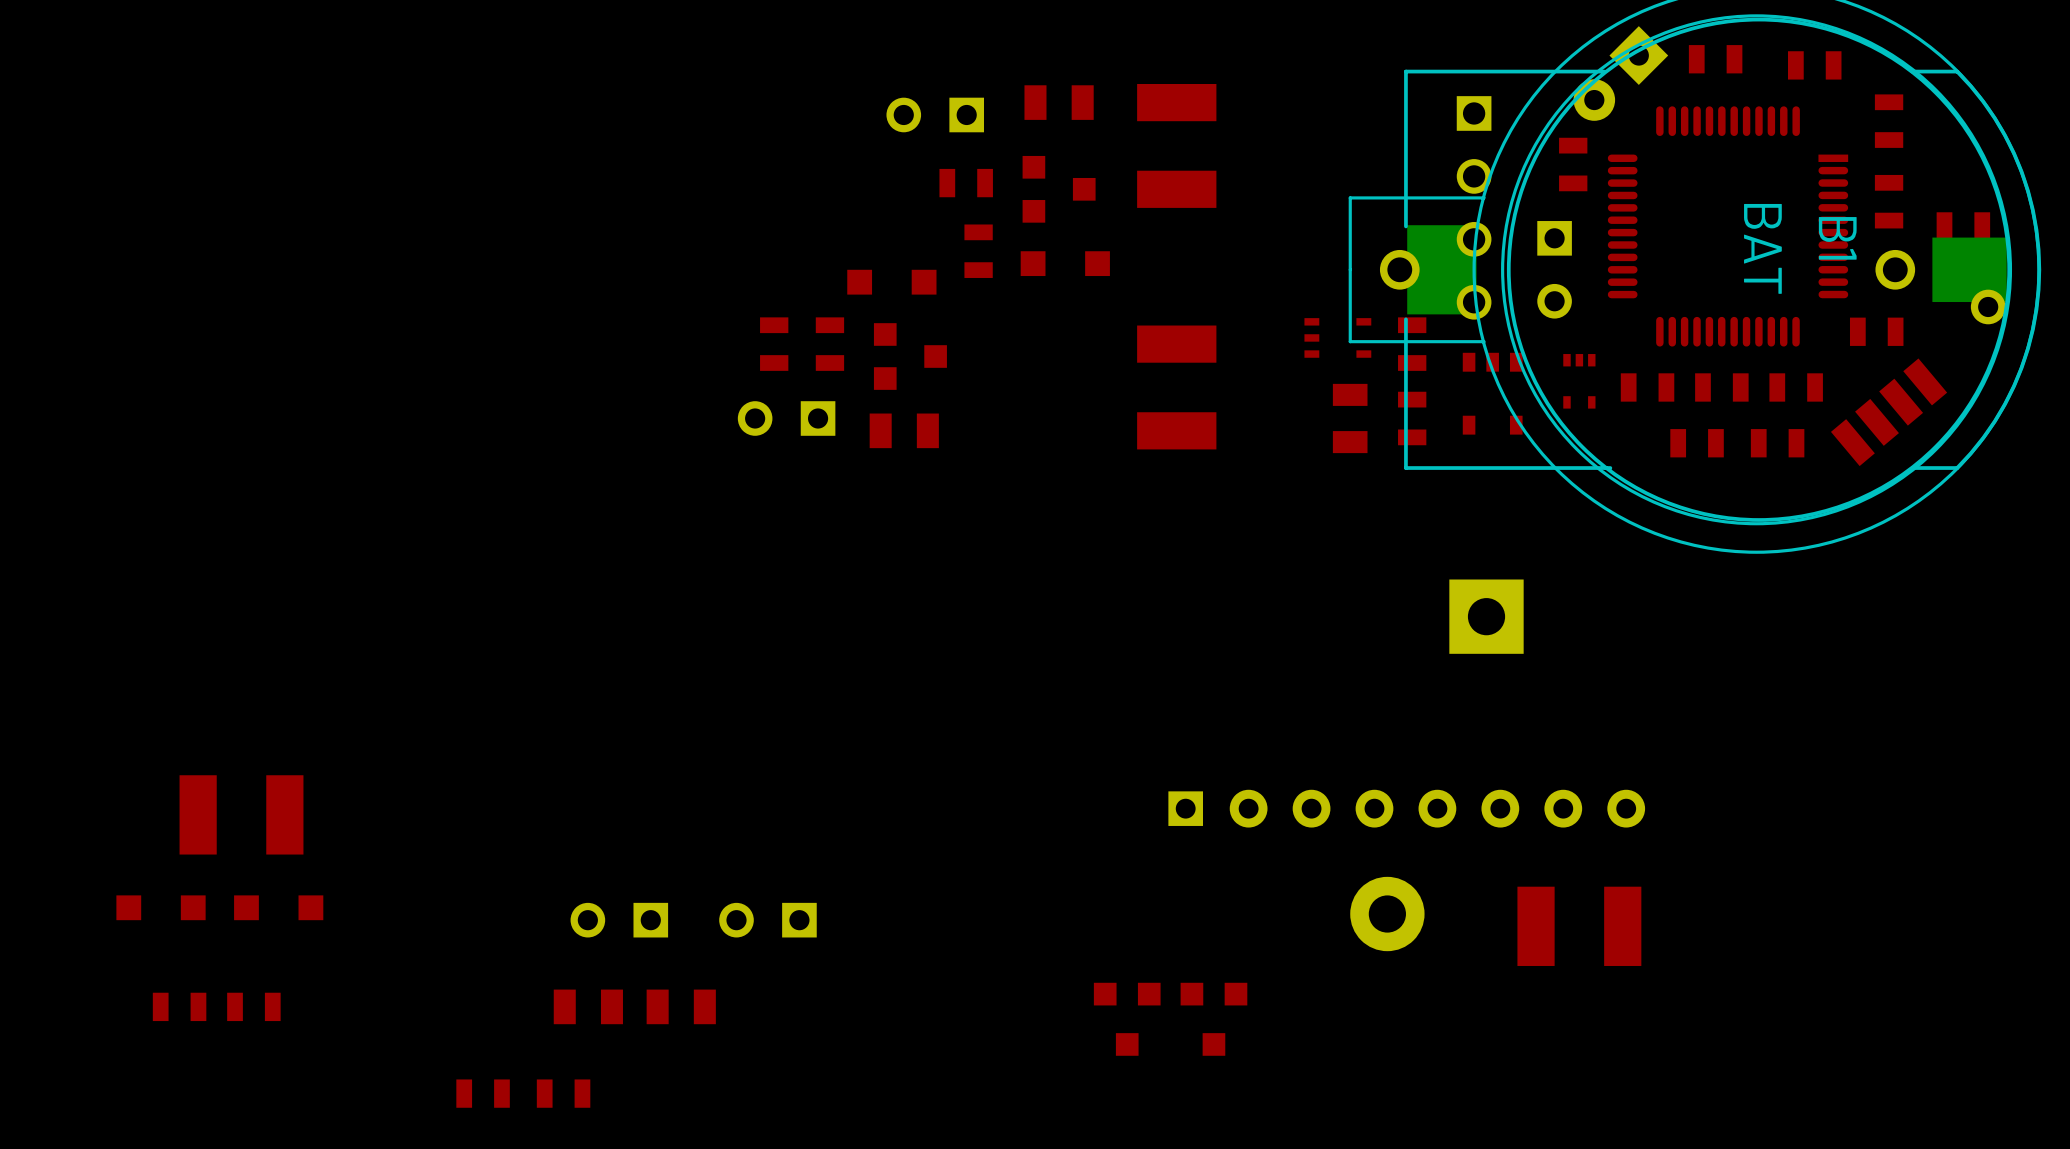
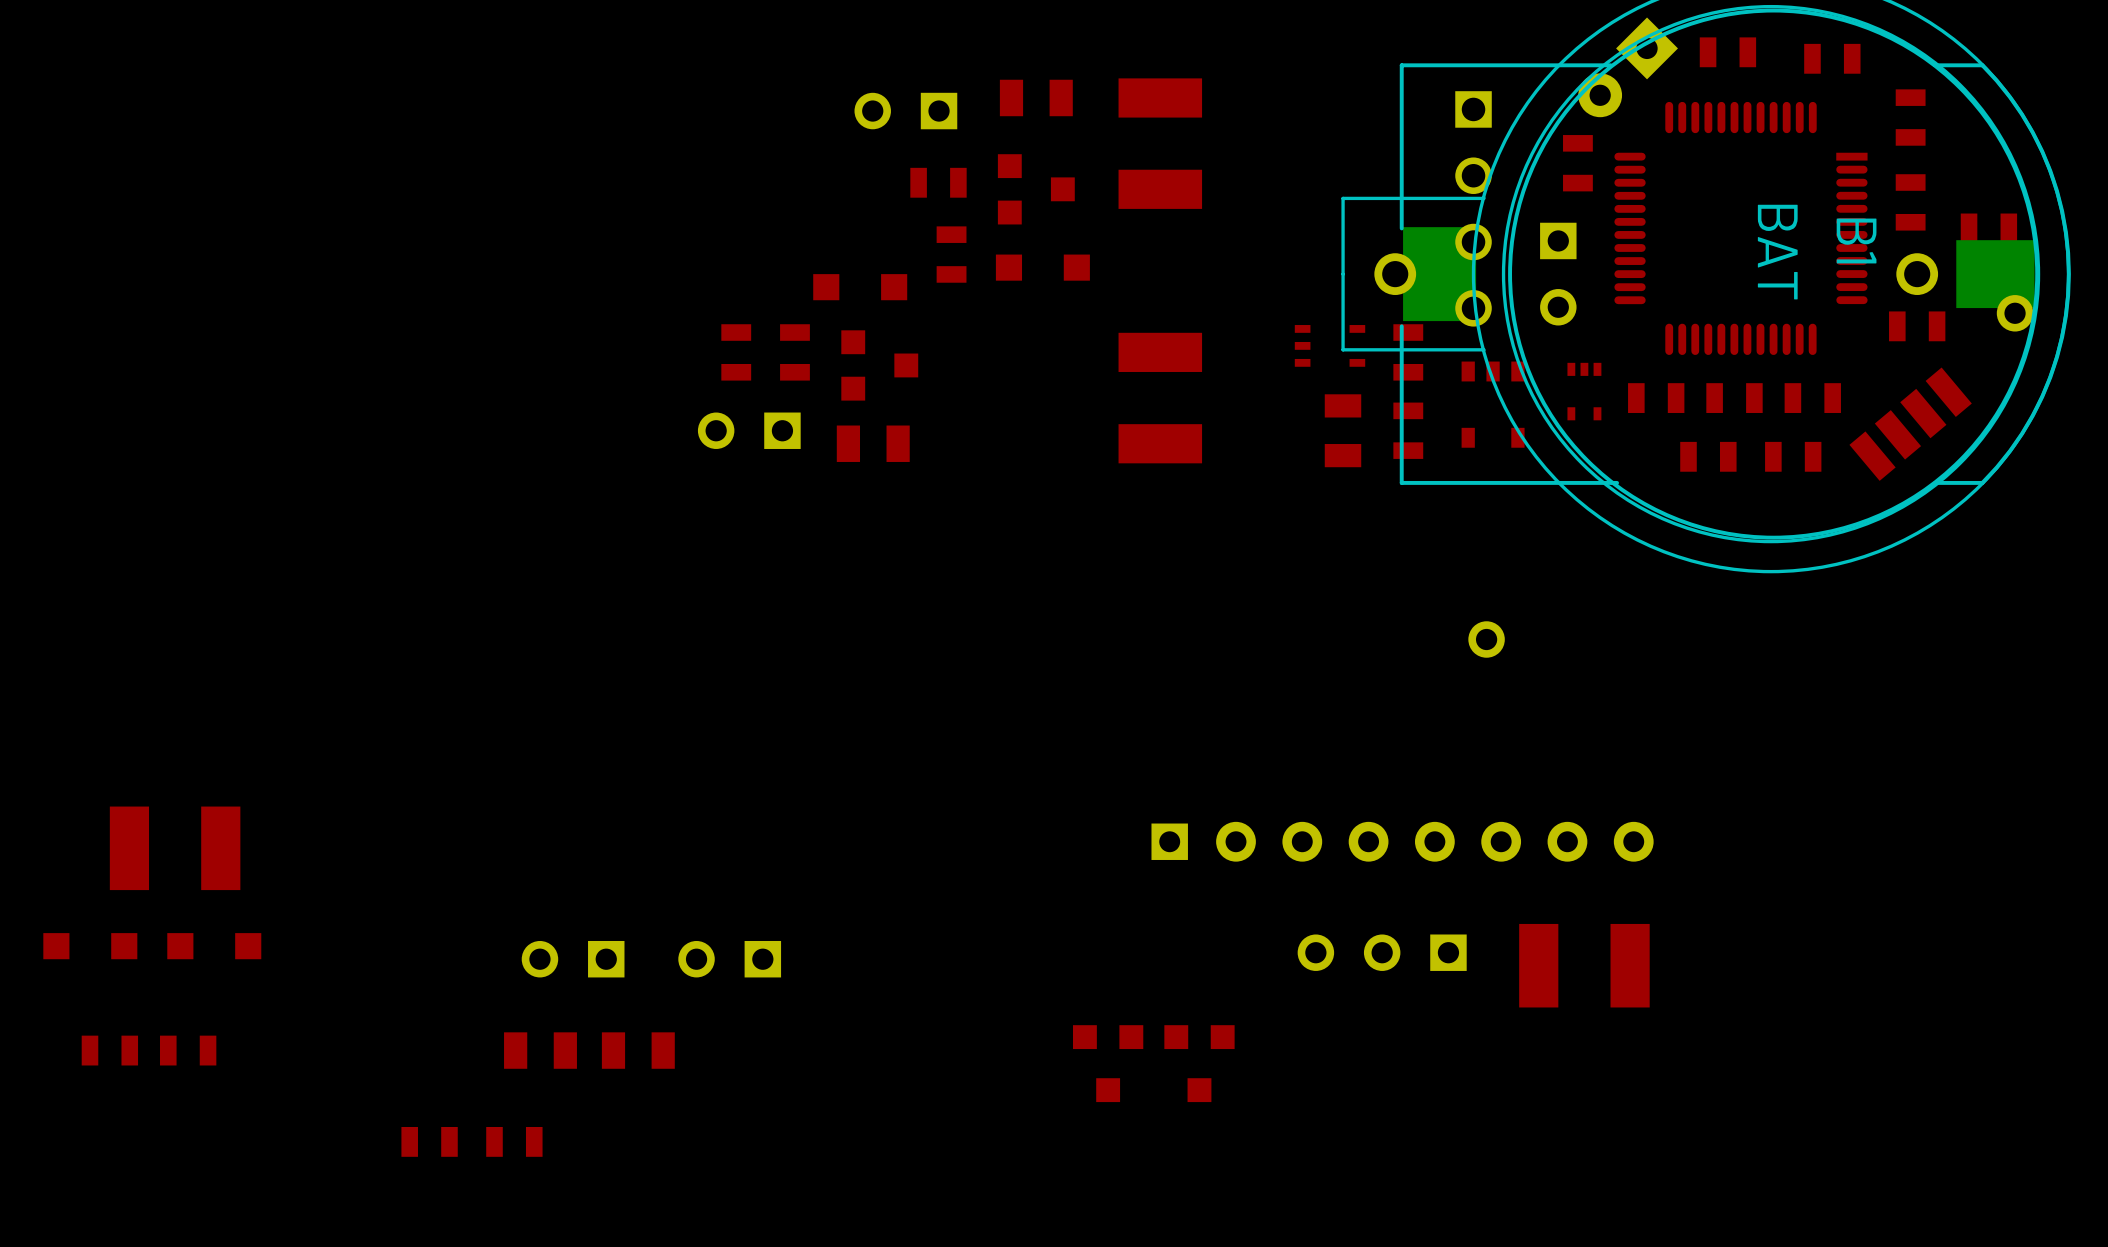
part position: (1876, 331) -> (1917, 326)
part footprint: [1449, 579, 1524, 654] -> [1468, 621, 1505, 658]
part footprint: [1350, 876, 1425, 952] -> [1297, 934, 1467, 971]

